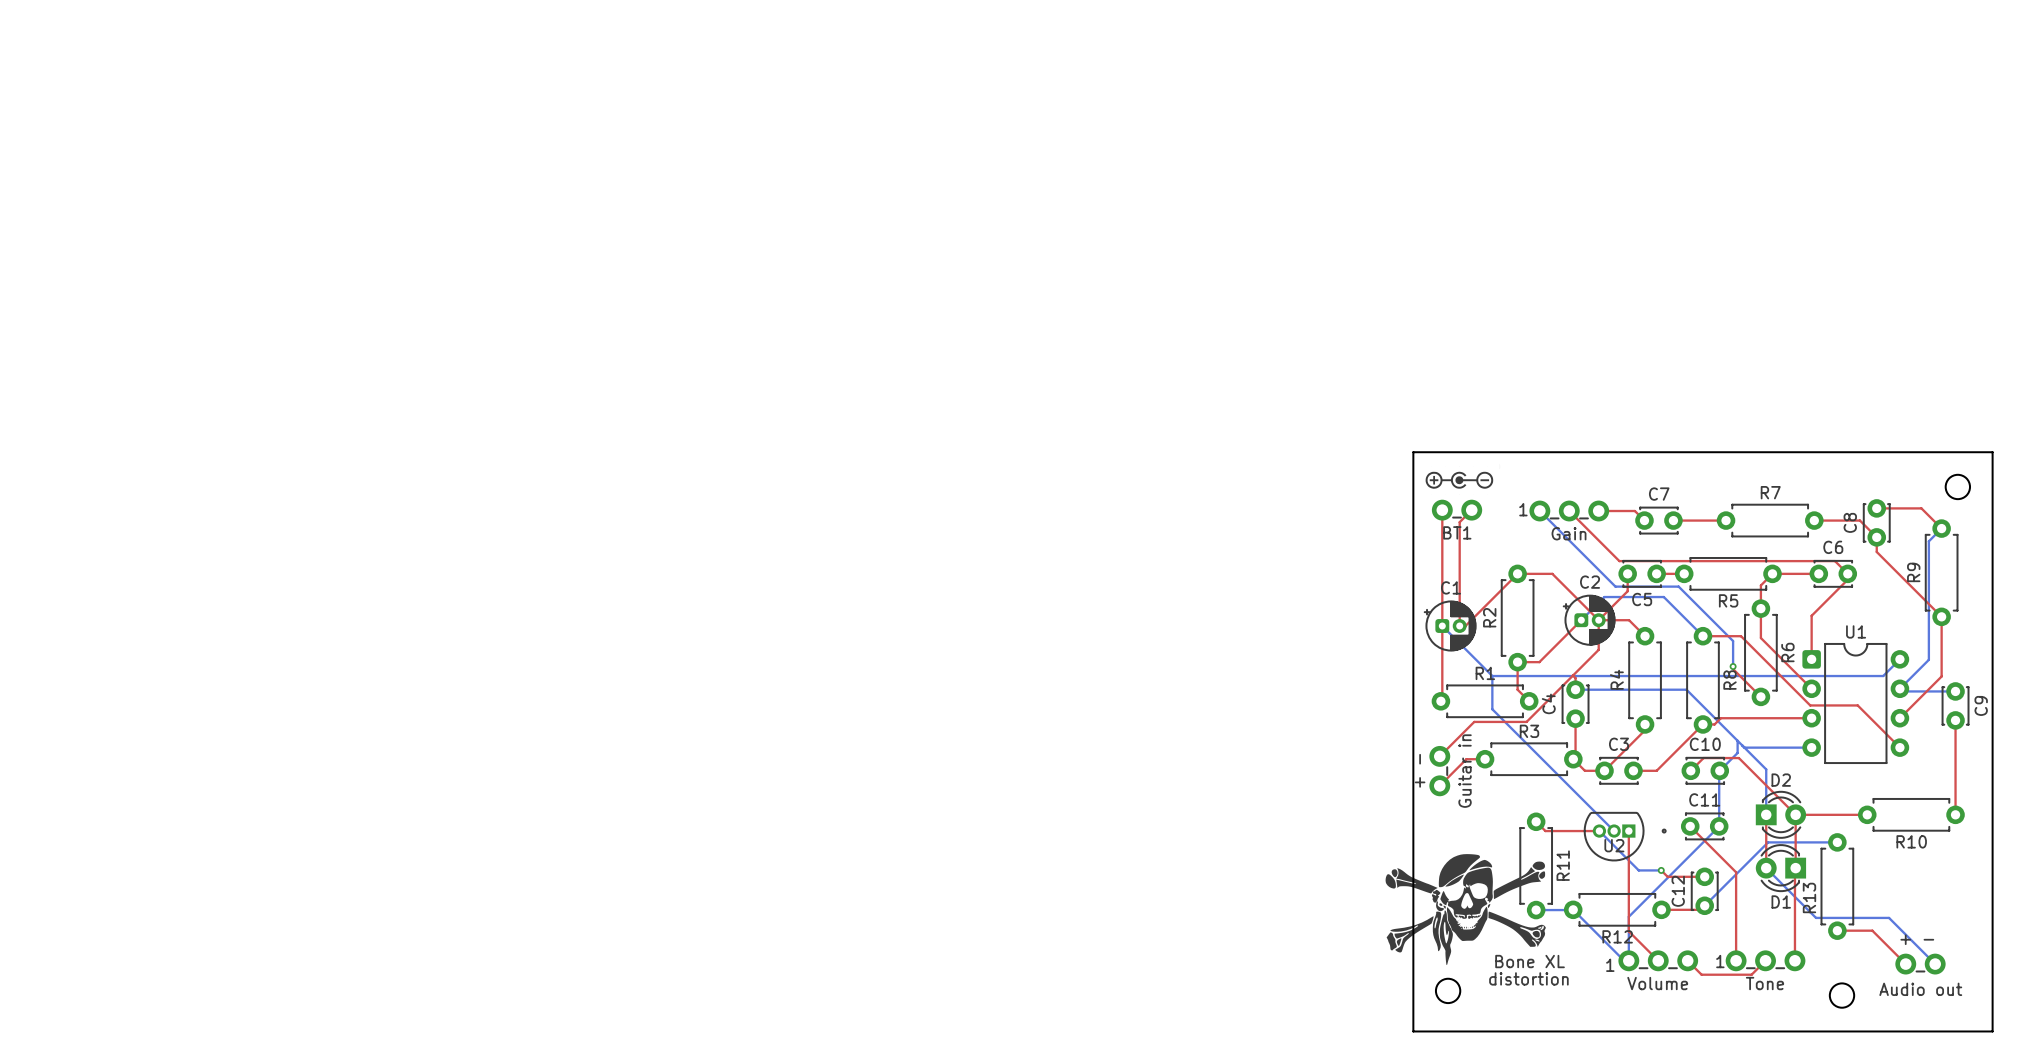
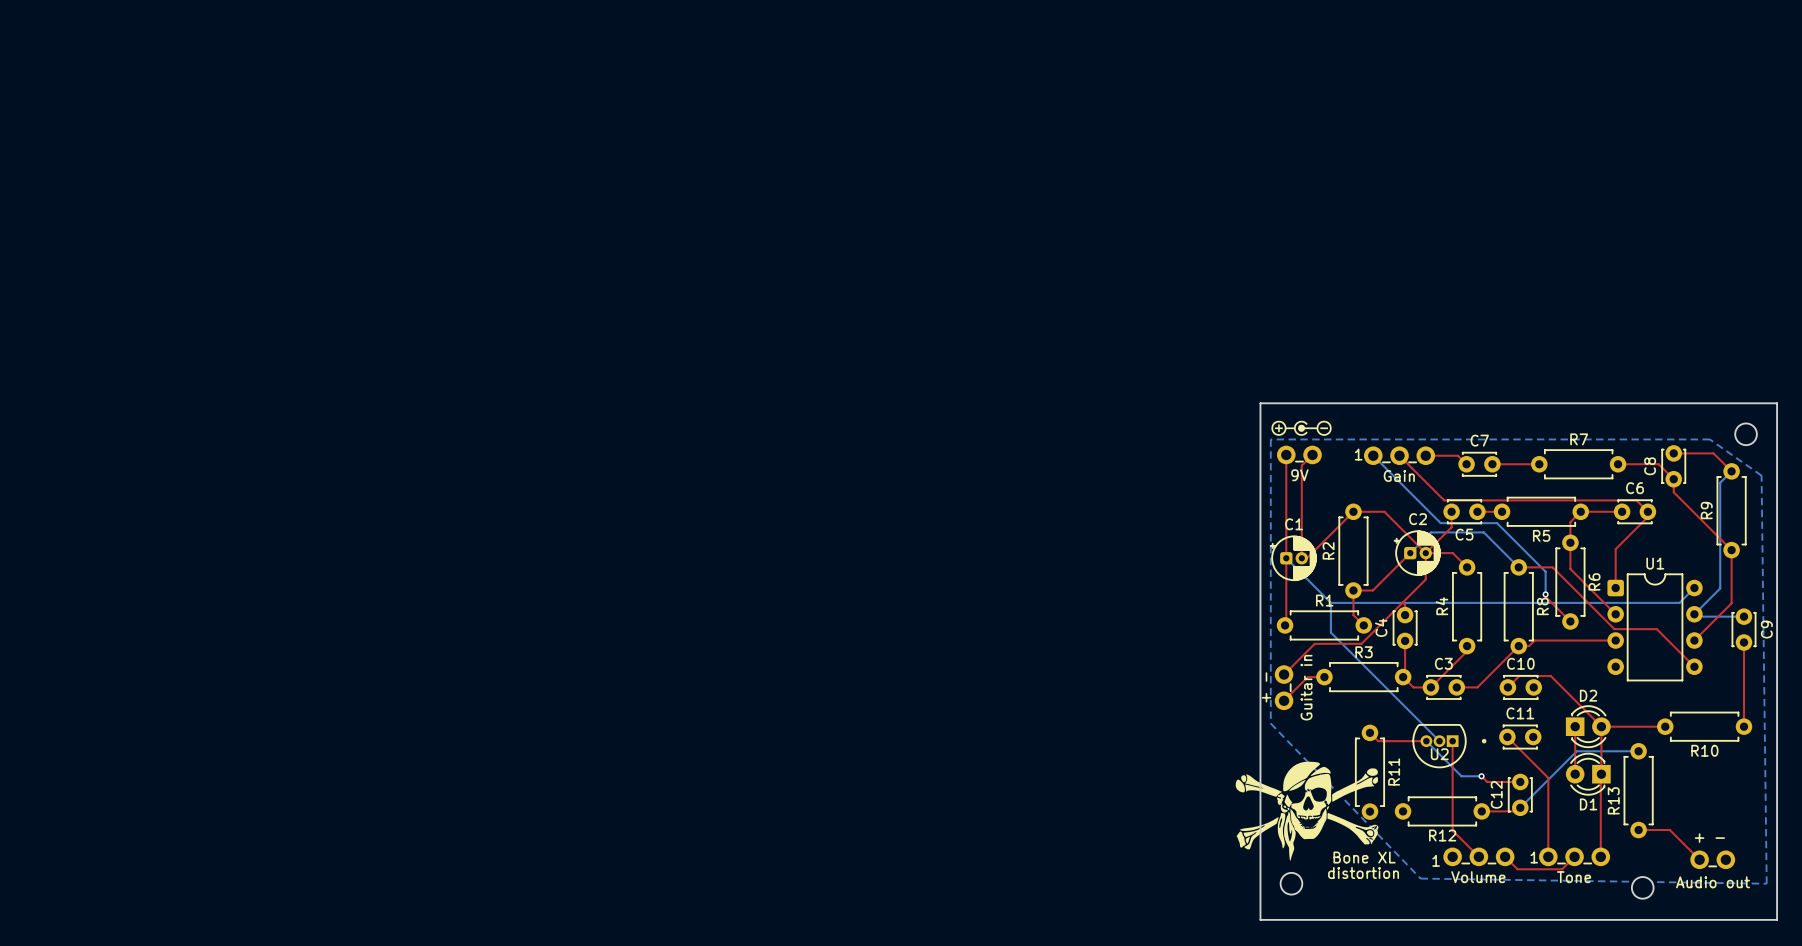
bottom zone outline: none -> (1270, 439) (1270, 723) (1420, 878) (1766, 883) (1761, 475) (1709, 439) (1270, 439)
BT1 name: BT1 (1457, 532) -> 9V (1299, 475)
bottom track: (1575, 689) (1686, 689) (1766, 769) (1766, 814) -> none
bottom track: (1737, 740) (1737, 752) (1719, 770) -> none
bottom track: (1744, 747) (1811, 747) -> none
bottom track: (1719, 771) (1719, 826) (1628, 916) (1628, 960) -> none
bottom track: (1766, 868) (1816, 917) (1889, 917) (1935, 964) -> none
bottom track: (1573, 909) (1624, 960) -> none
bottom track: (1536, 910) (1572, 910) -> none

